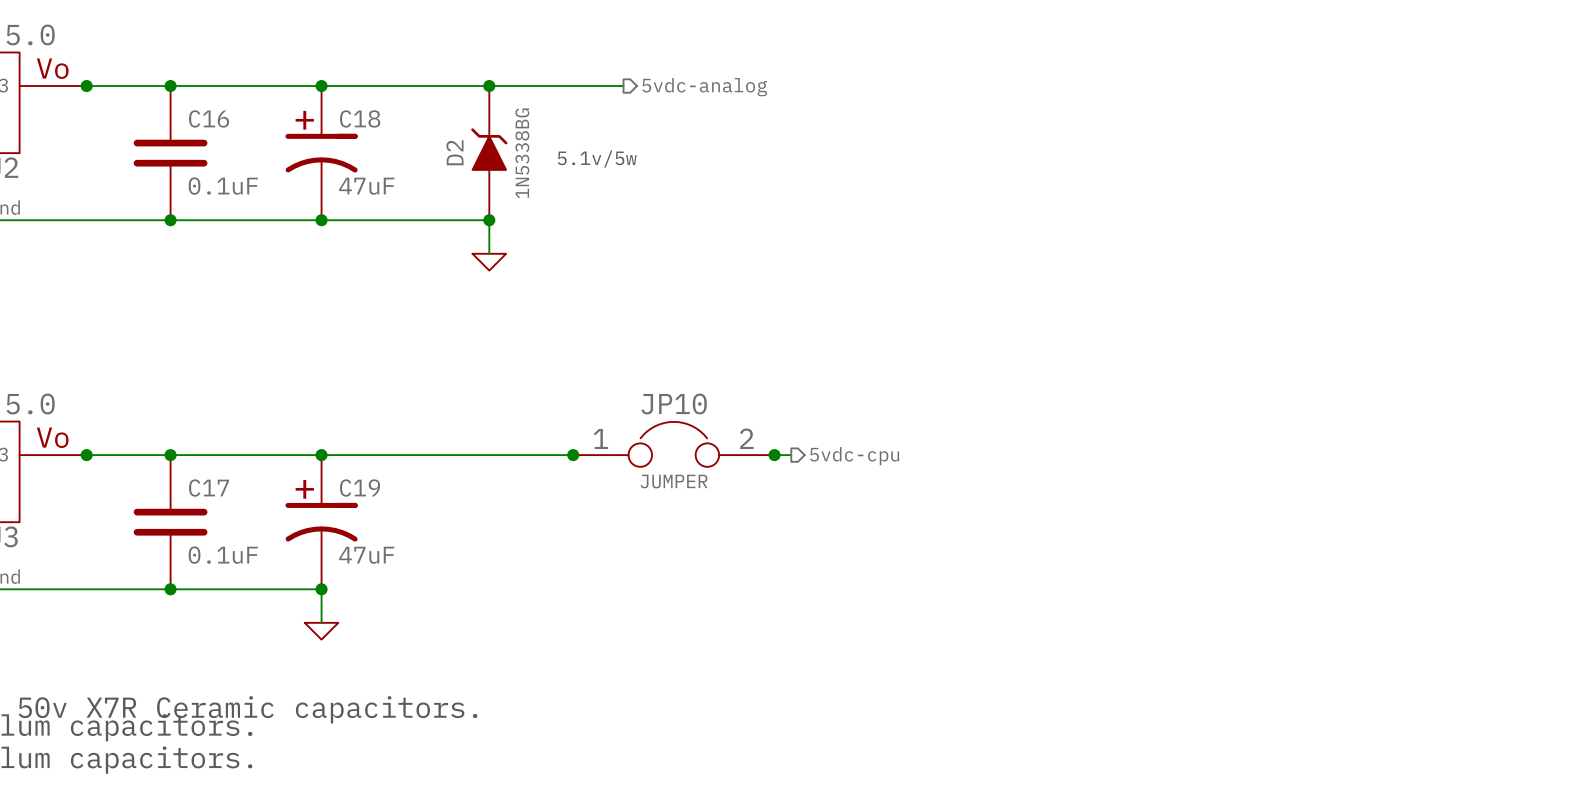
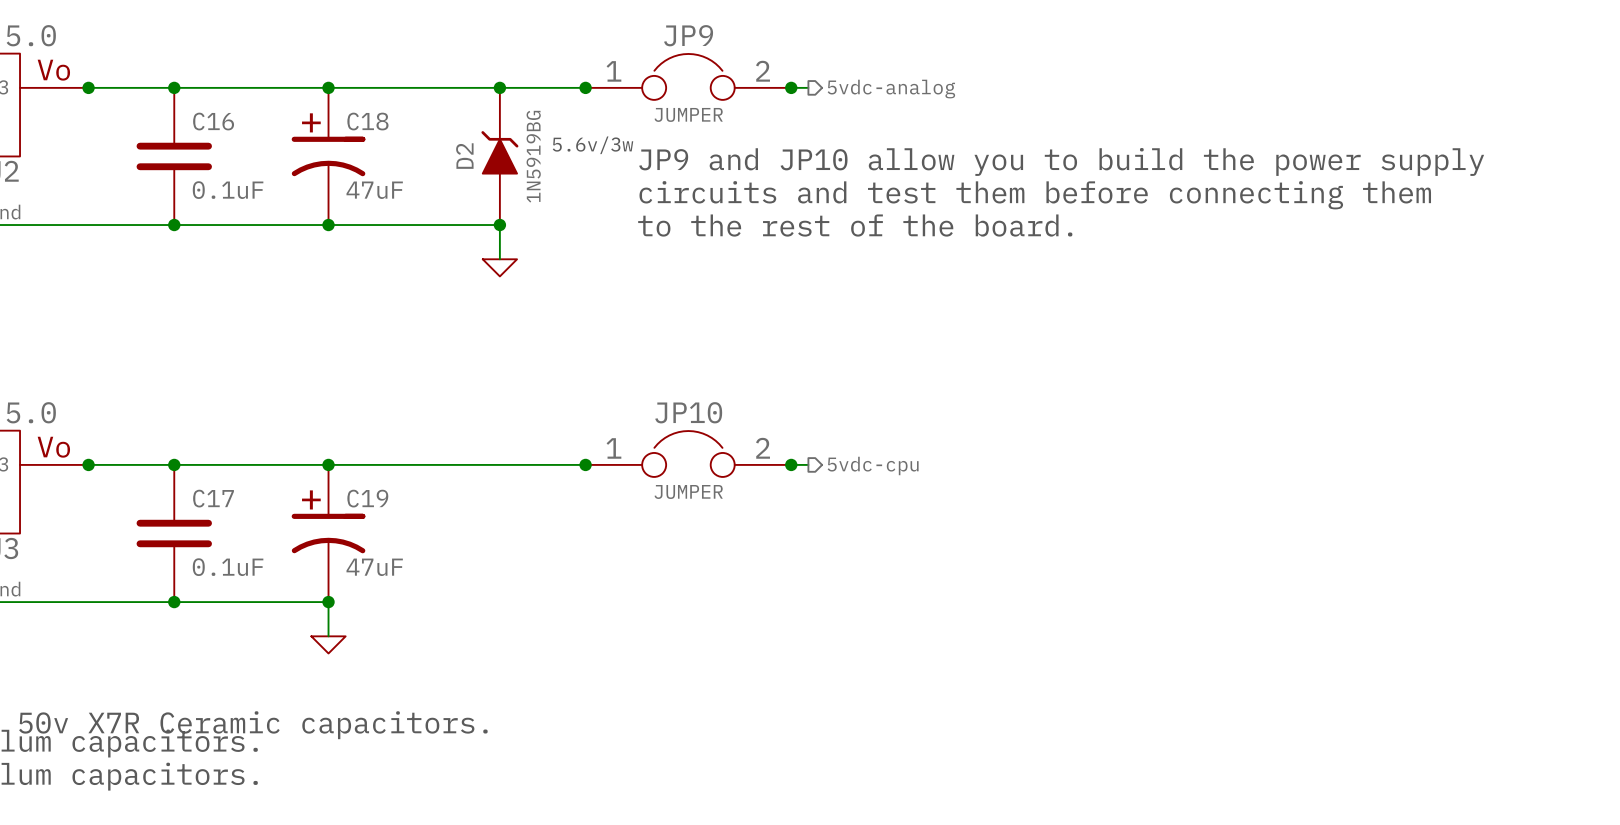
JP9: none -> JUMPER (688, 76)
junction: none -> (585, 87)
wire: none -> (791, 87) (808, 87)
junction: none -> (791, 87)
hierarchical label position: 5vdc-analog (704, 87) -> 5vdc-analog (891, 89)
D2 value: 1N5338BG (522, 153) -> 1N5919BG (533, 156)
text: 5.1v/5w (597, 158) -> 5.6v/3w (592, 145)
text: none -> JP9 and JP10 allow you to build the power supply (1061, 161)
text: none -> circuits and test them before connecting them (1035, 195)
text: none -> to the rest of the board. (855, 225)

